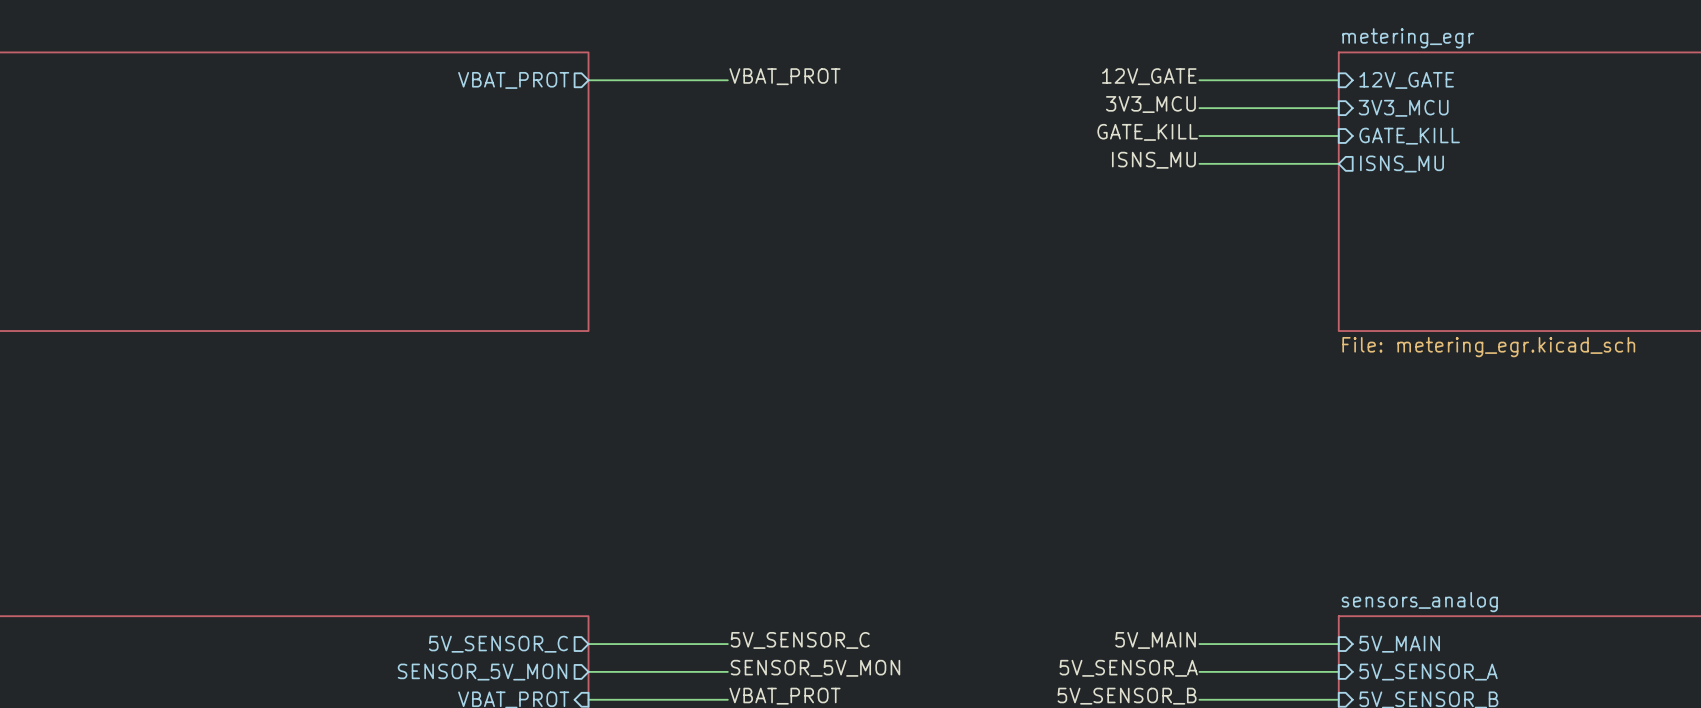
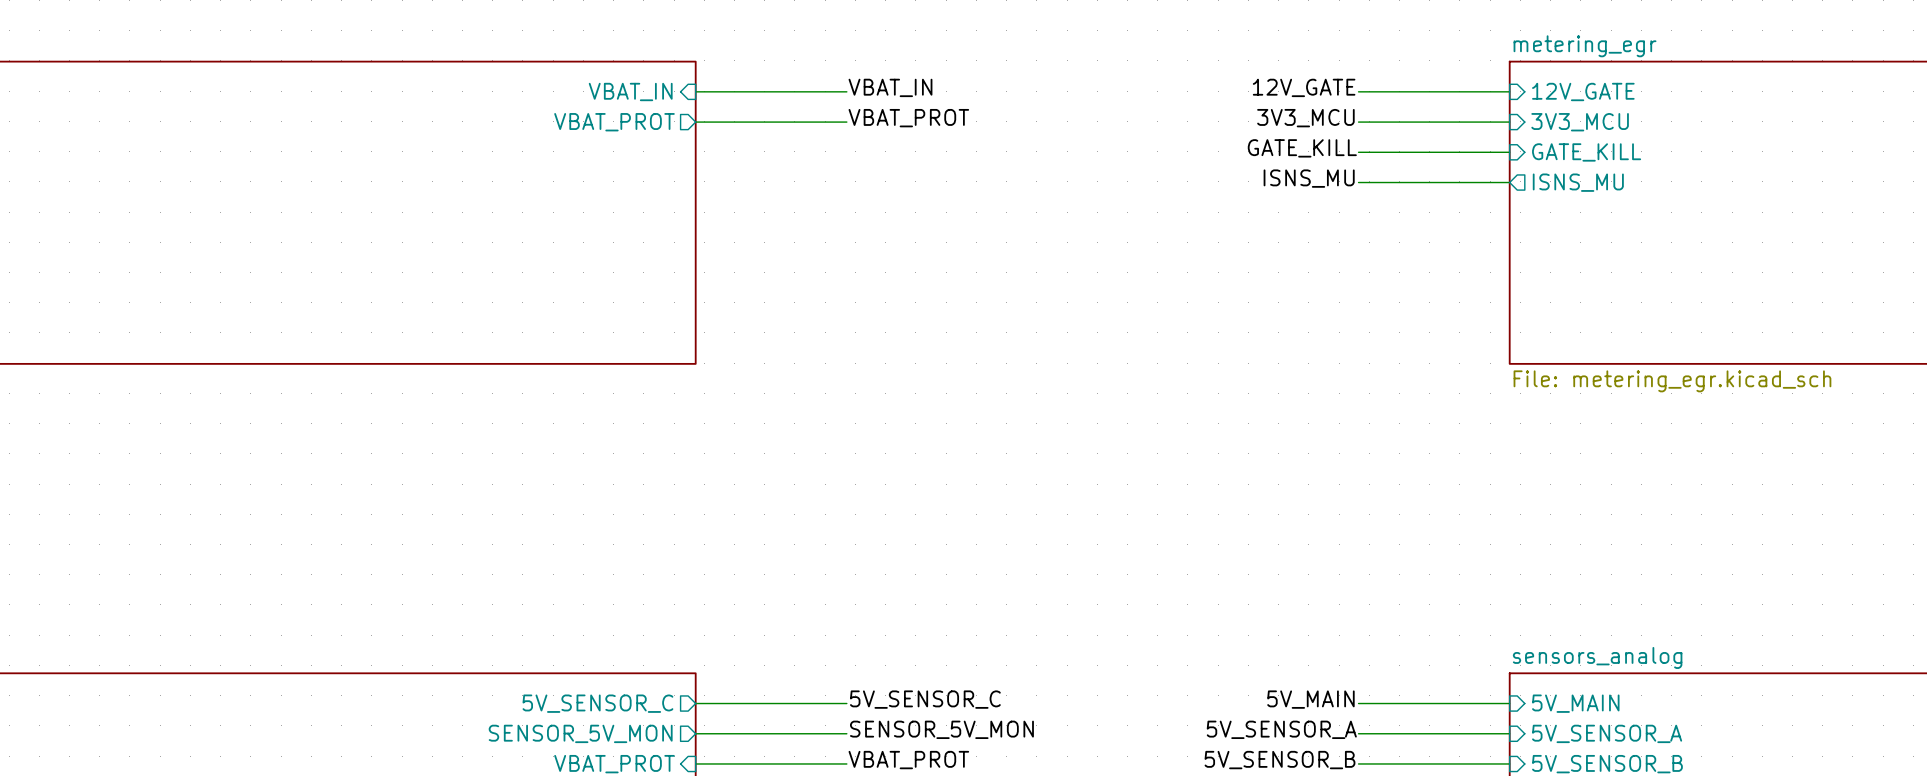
label: VBAT_PROT (784, 76) -> VBAT_IN (890, 87)
sheet pin shape: output (513, 80) -> input (630, 91)
sheet pin: VBAT_PROT (513, 80) -> VBAT_IN (630, 91)
label: none -> VBAT_PROT (908, 118)
sheet pin: none -> VBAT_PROT (614, 122)
wire: none -> (695, 122) (846, 122)

